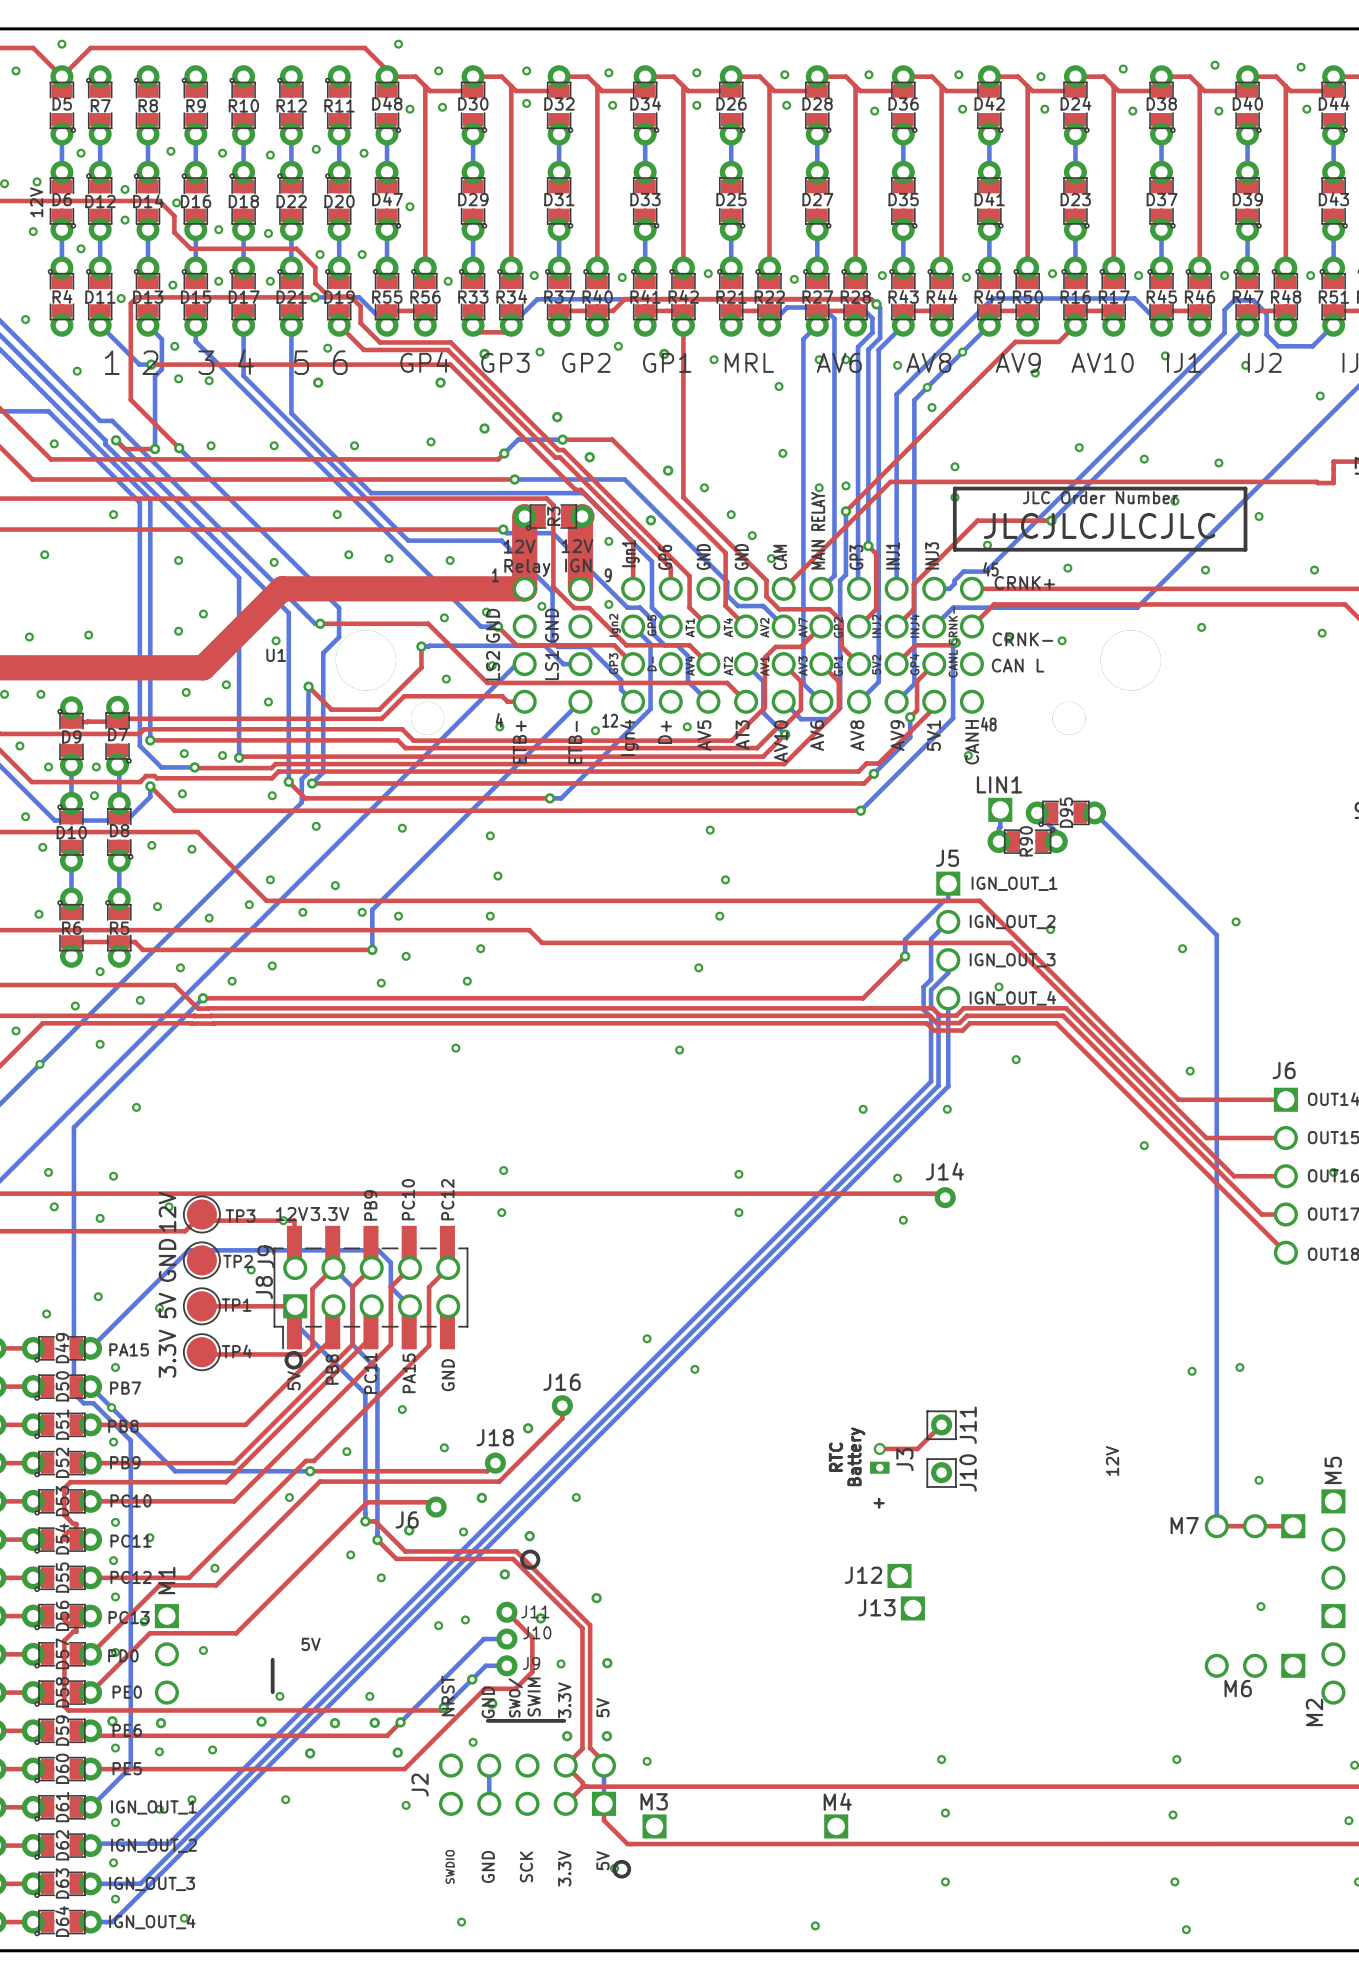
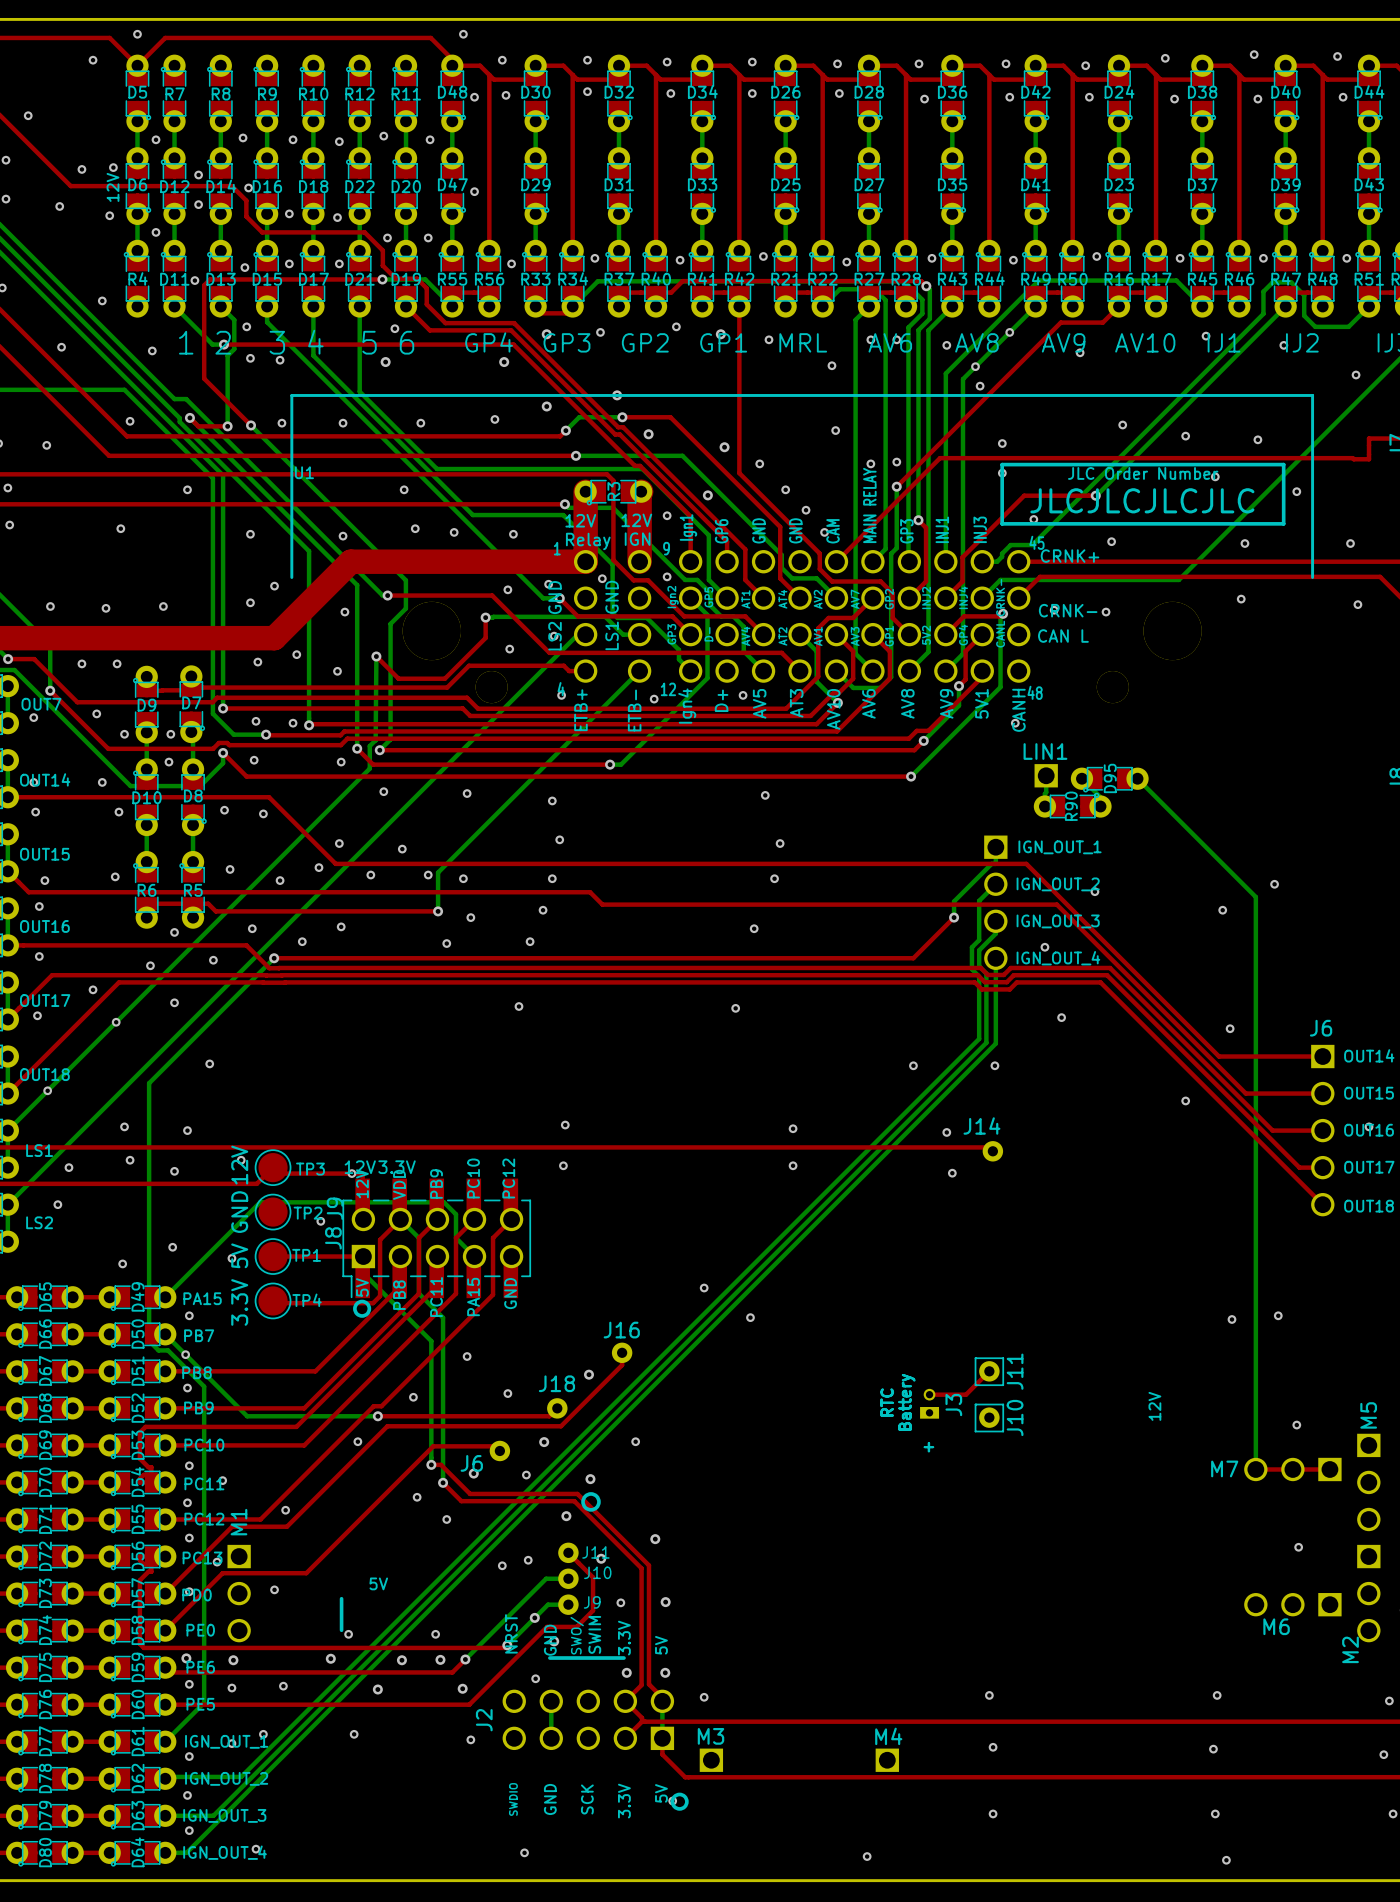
U1 footprint: [154, 576, 1346, 1879] -> [227, 394, 1381, 1811]
U1 name position: U1 (276, 655) -> U1 (304, 472)

